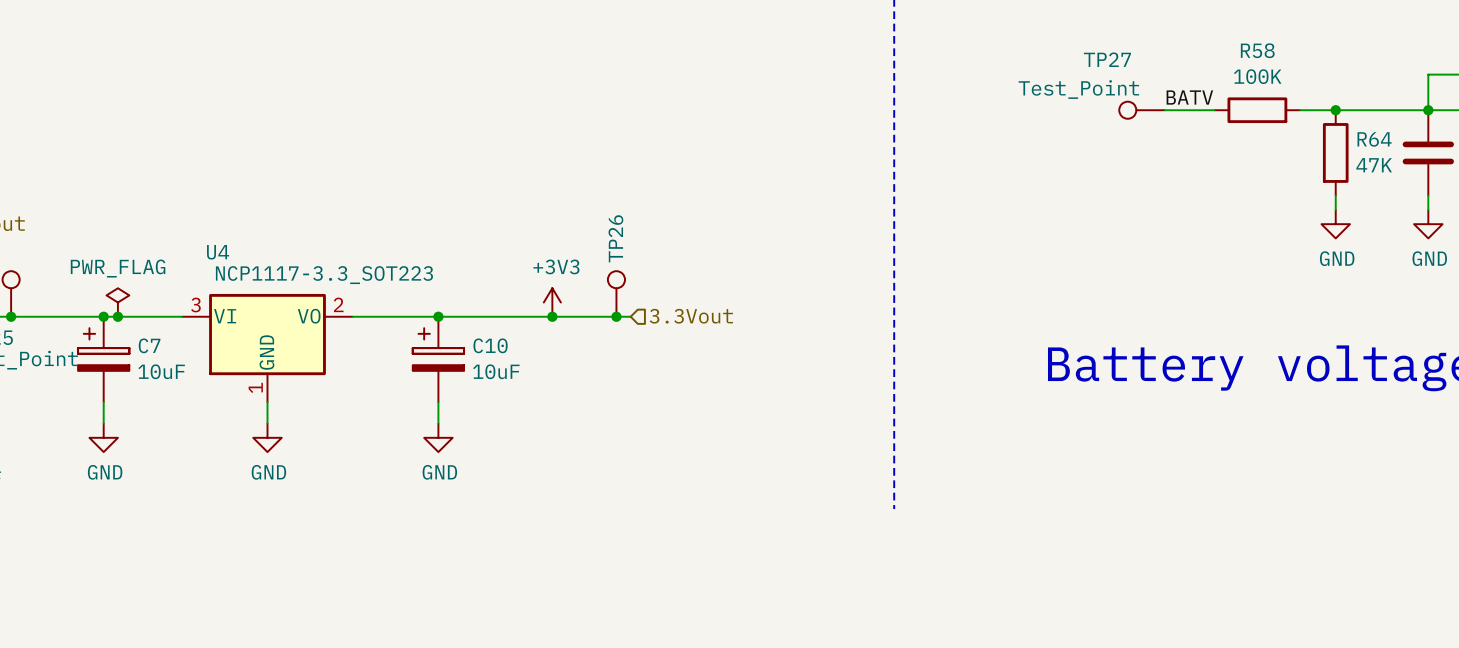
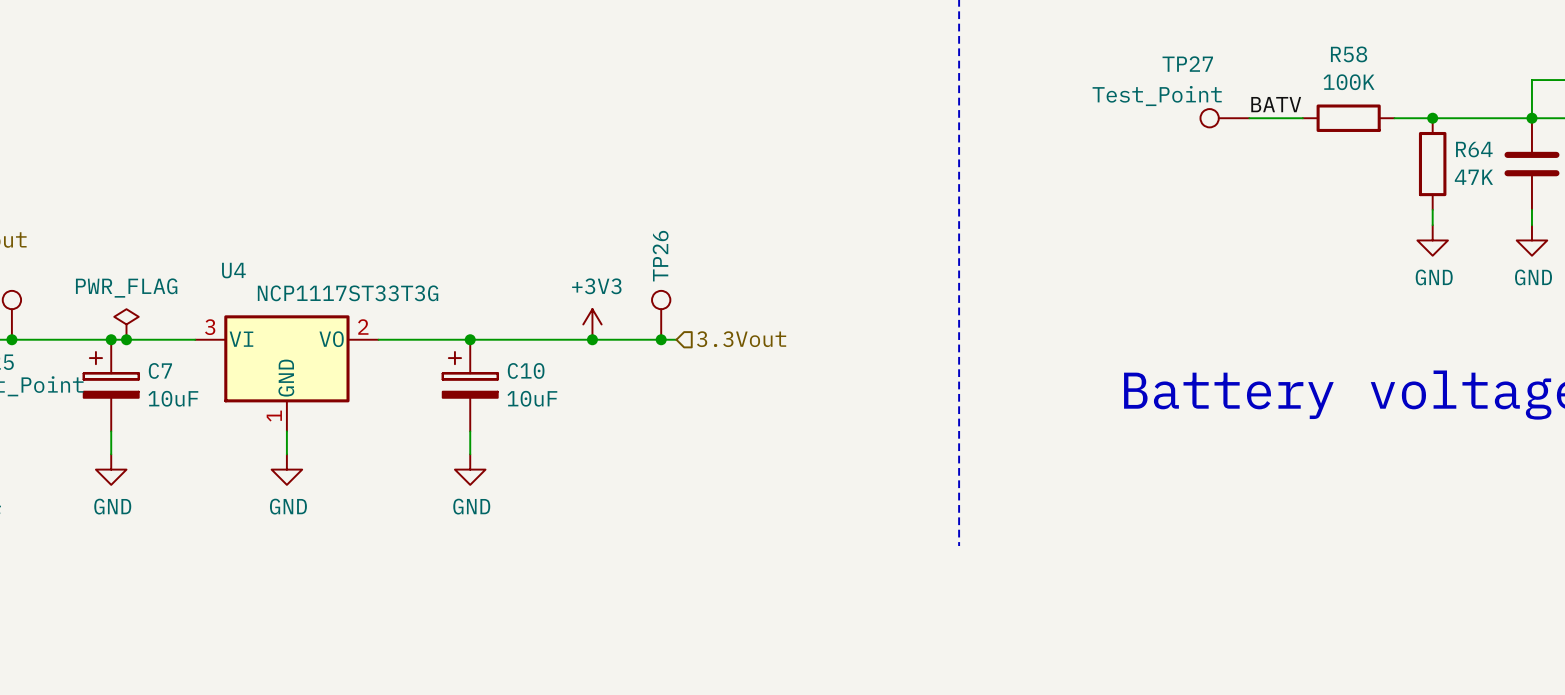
U4 value: NCP1117-3.3_SOT223 (324, 275) -> NCP1117ST33T3G (348, 293)

